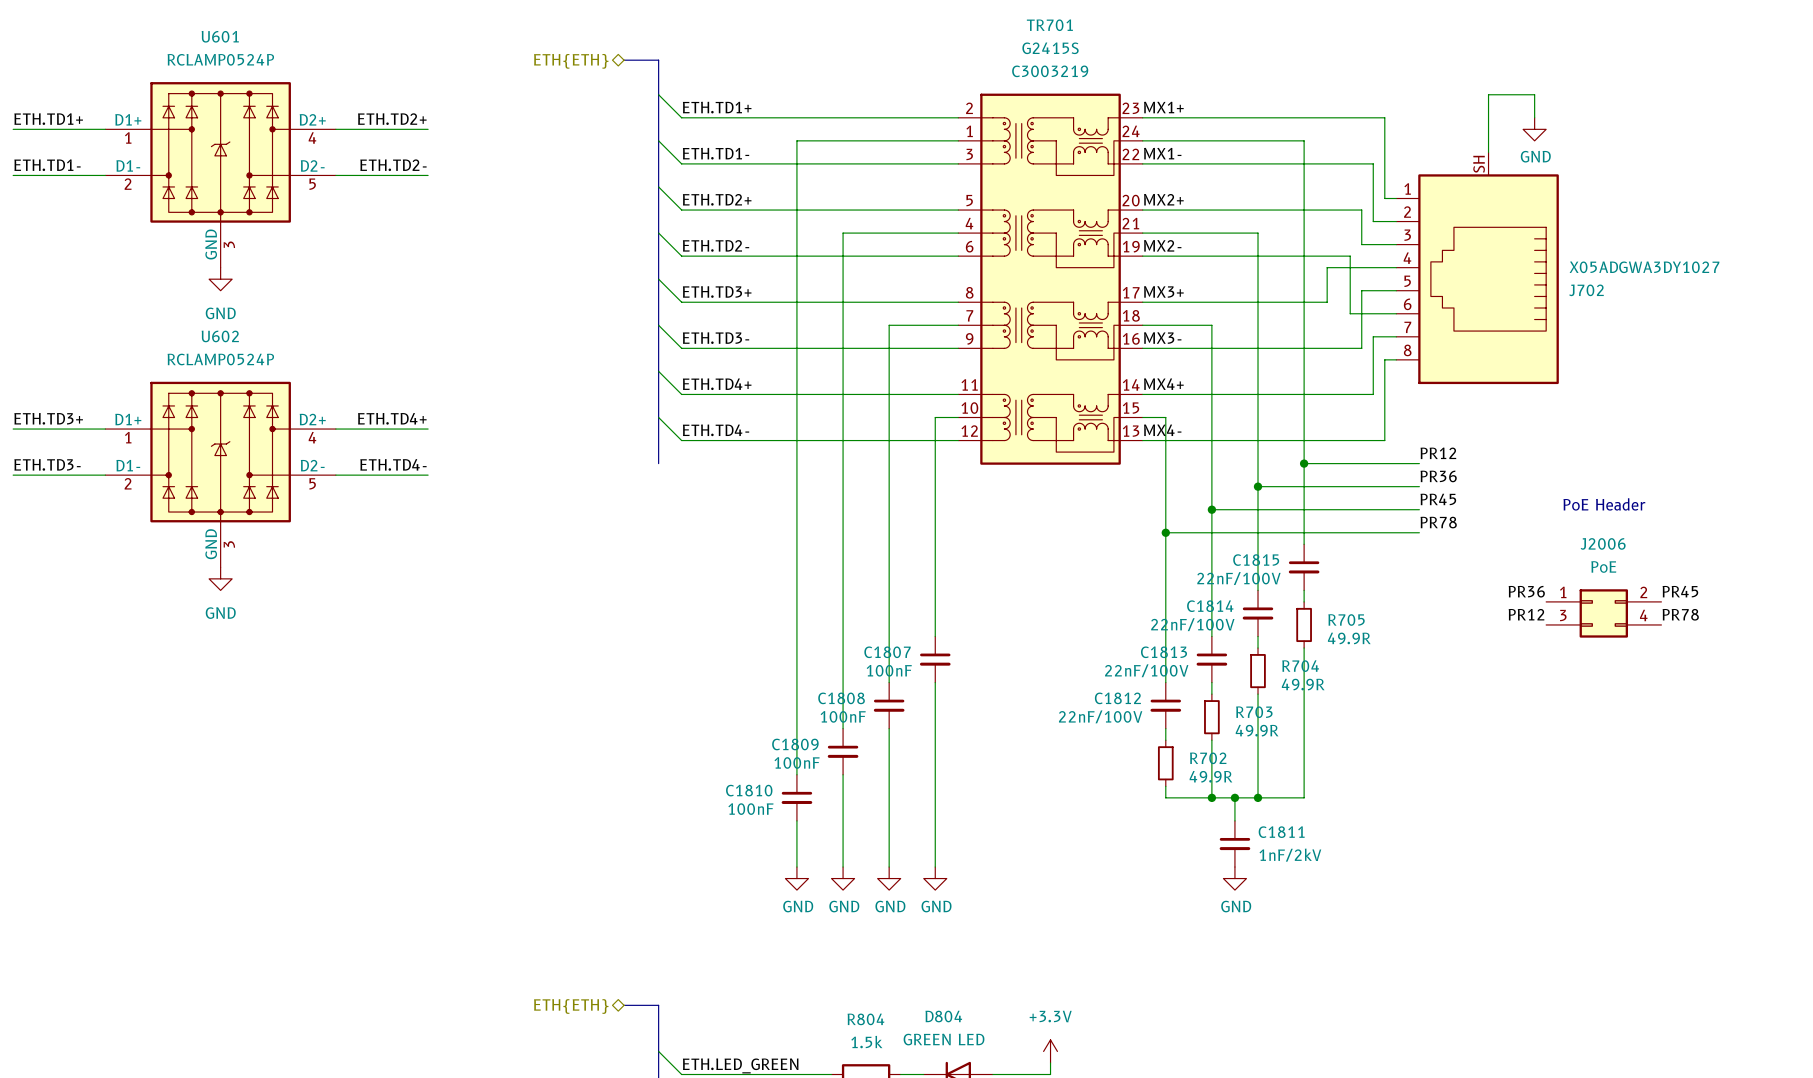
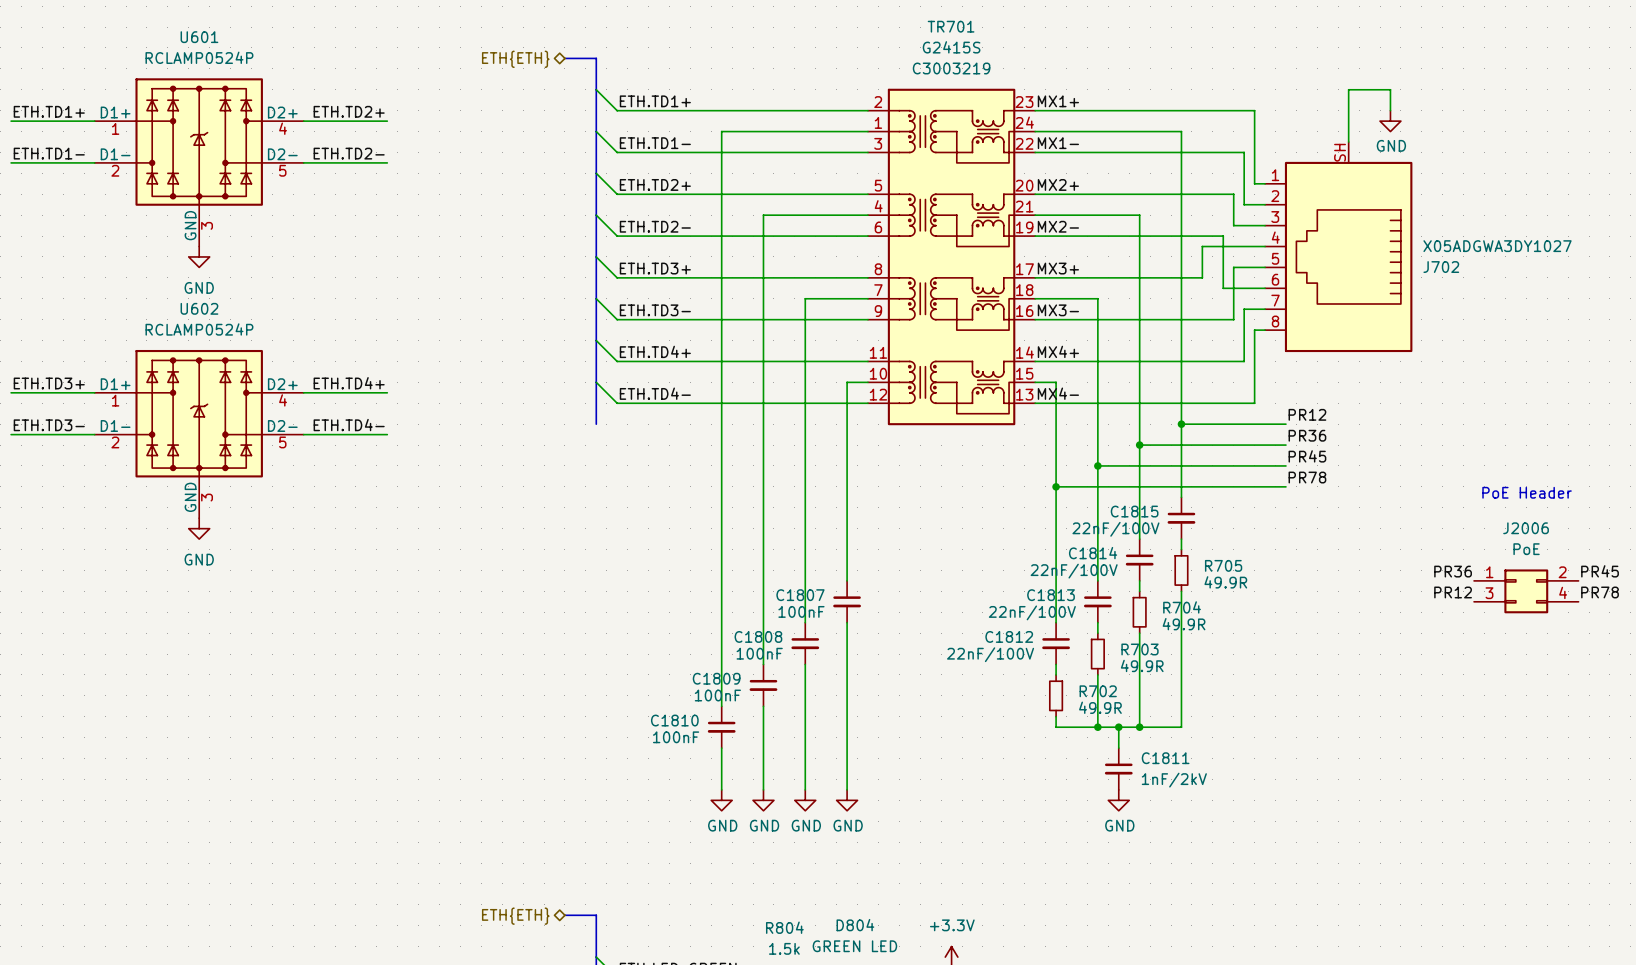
text position: PoE Header (1604, 504) -> PoE Header (1527, 492)
label position: PR36 (1526, 591) -> PR36 (1453, 571)
label position: PR45 (1680, 591) -> PR45 (1600, 571)
J2006 position: (1603, 613) -> (1526, 591)
label position: PR12 (1526, 614) -> PR12 (1453, 592)
label position: PR78 (1680, 614) -> PR78 (1600, 592)

